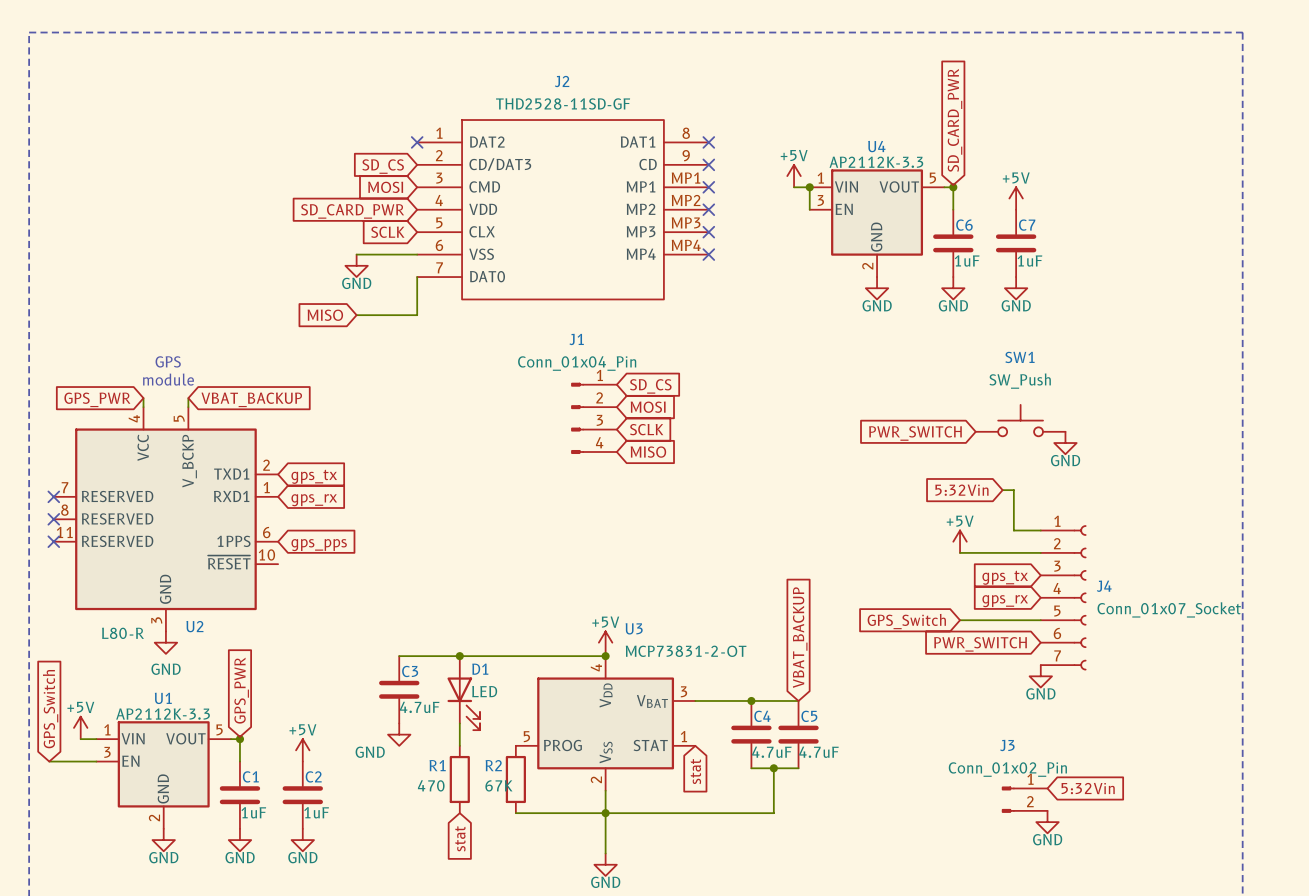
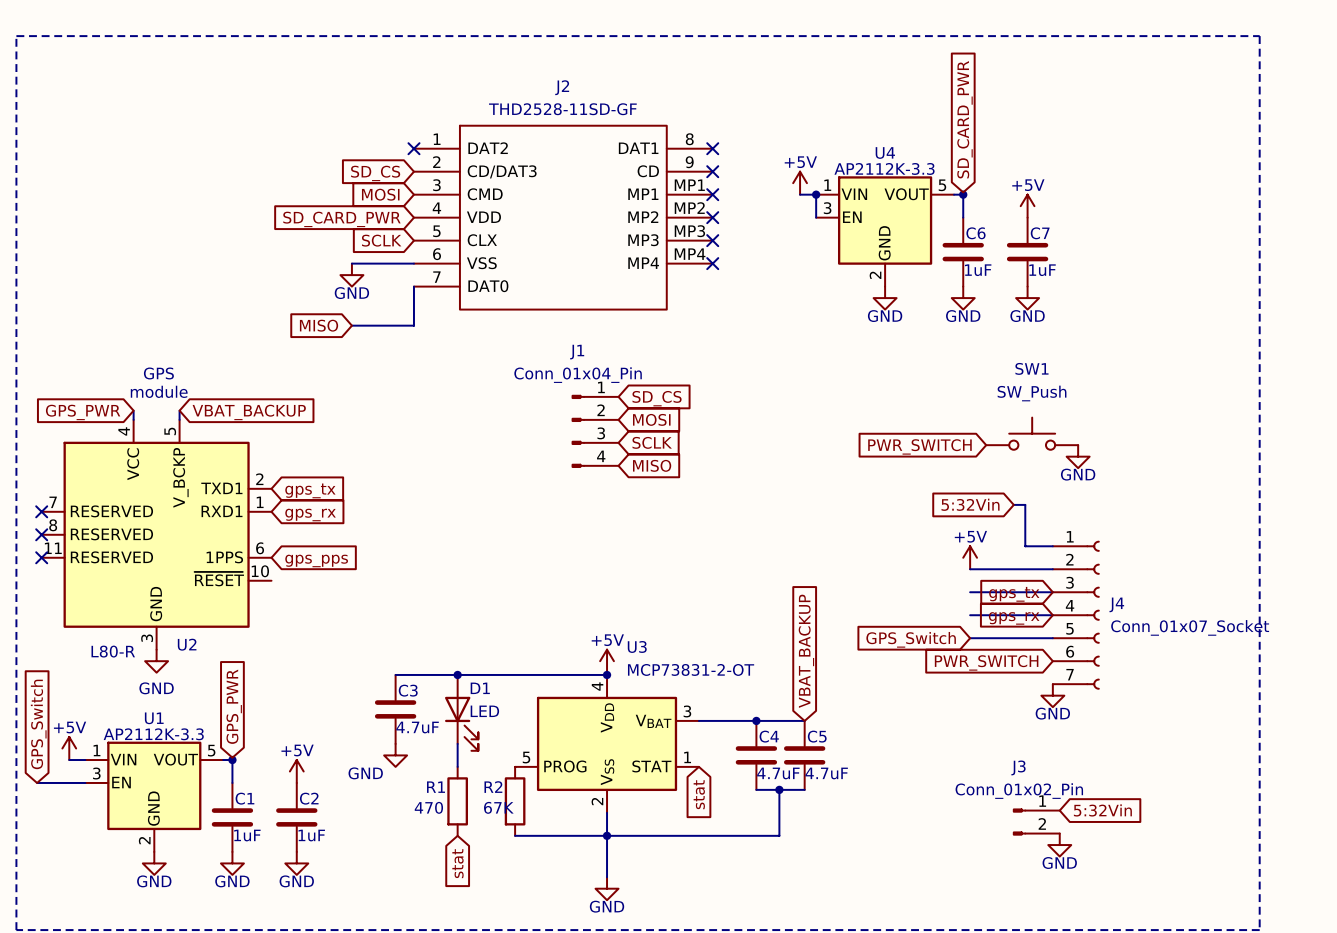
wire: none -> (970, 592) (1052, 592)
wire: none -> (970, 615) (1052, 615)

